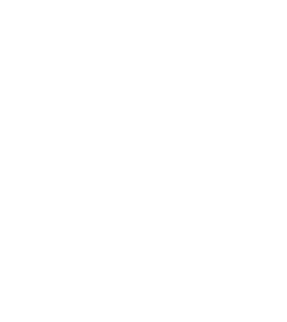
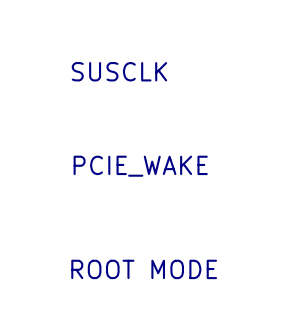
text: none -> SUSCLK (119, 71)
text: none -> PCIE_WAKE (140, 166)
text: none -> ROOT MODE (144, 269)

